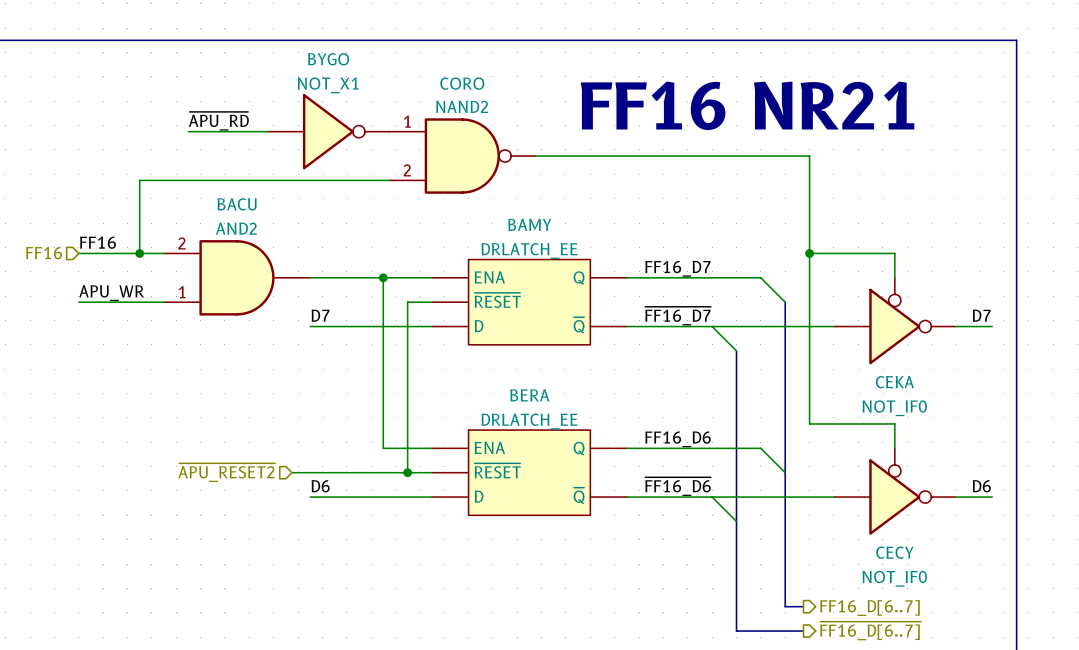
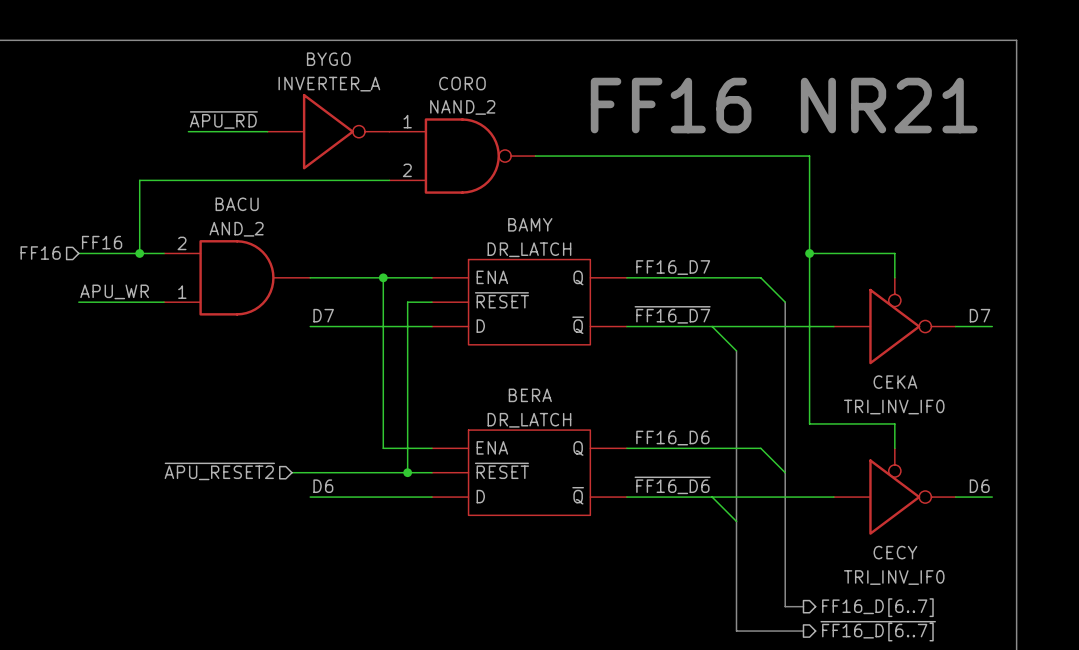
BYGO value: NOT_X1 (328, 85) -> INVERTER_A (329, 84)
CORO value: NAND2 (462, 106) -> NAND_2 (462, 107)
BACU value: AND2 (236, 228) -> AND_2 (236, 229)
BAMY value: DRLATCH_EE (529, 250) -> DR_LATCH (529, 249)
CEKA value: NOT_IF0 (894, 408) -> TRI_INV_IF0 (894, 407)
BERA value: DRLATCH_EE (529, 421) -> DR_LATCH (529, 420)
CECY value: NOT_IF0 (894, 578) -> TRI_INV_IF0 (894, 577)

